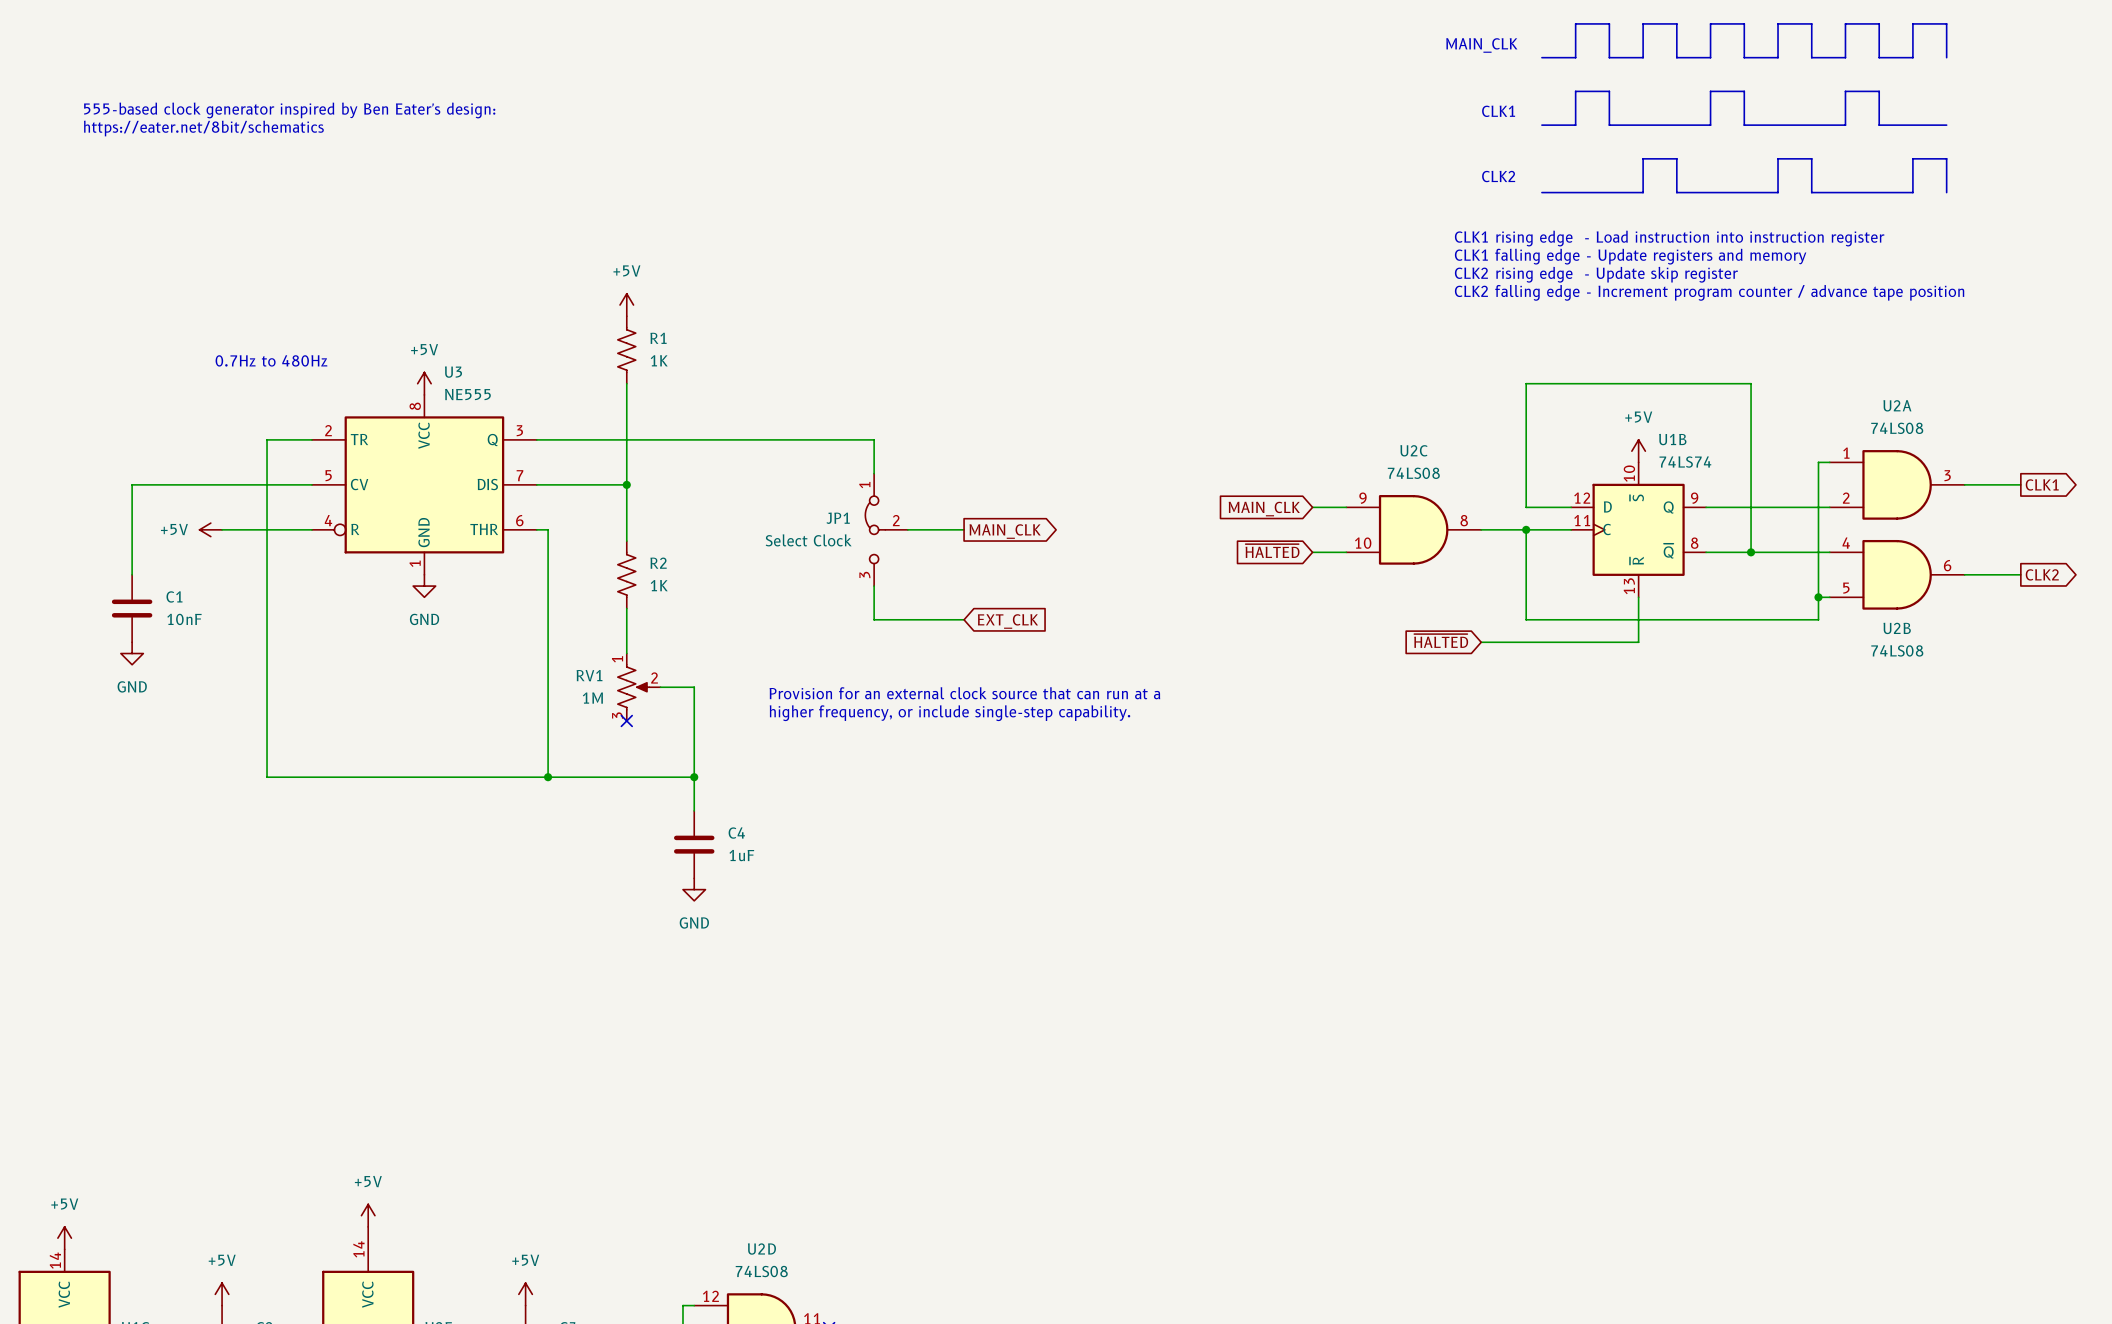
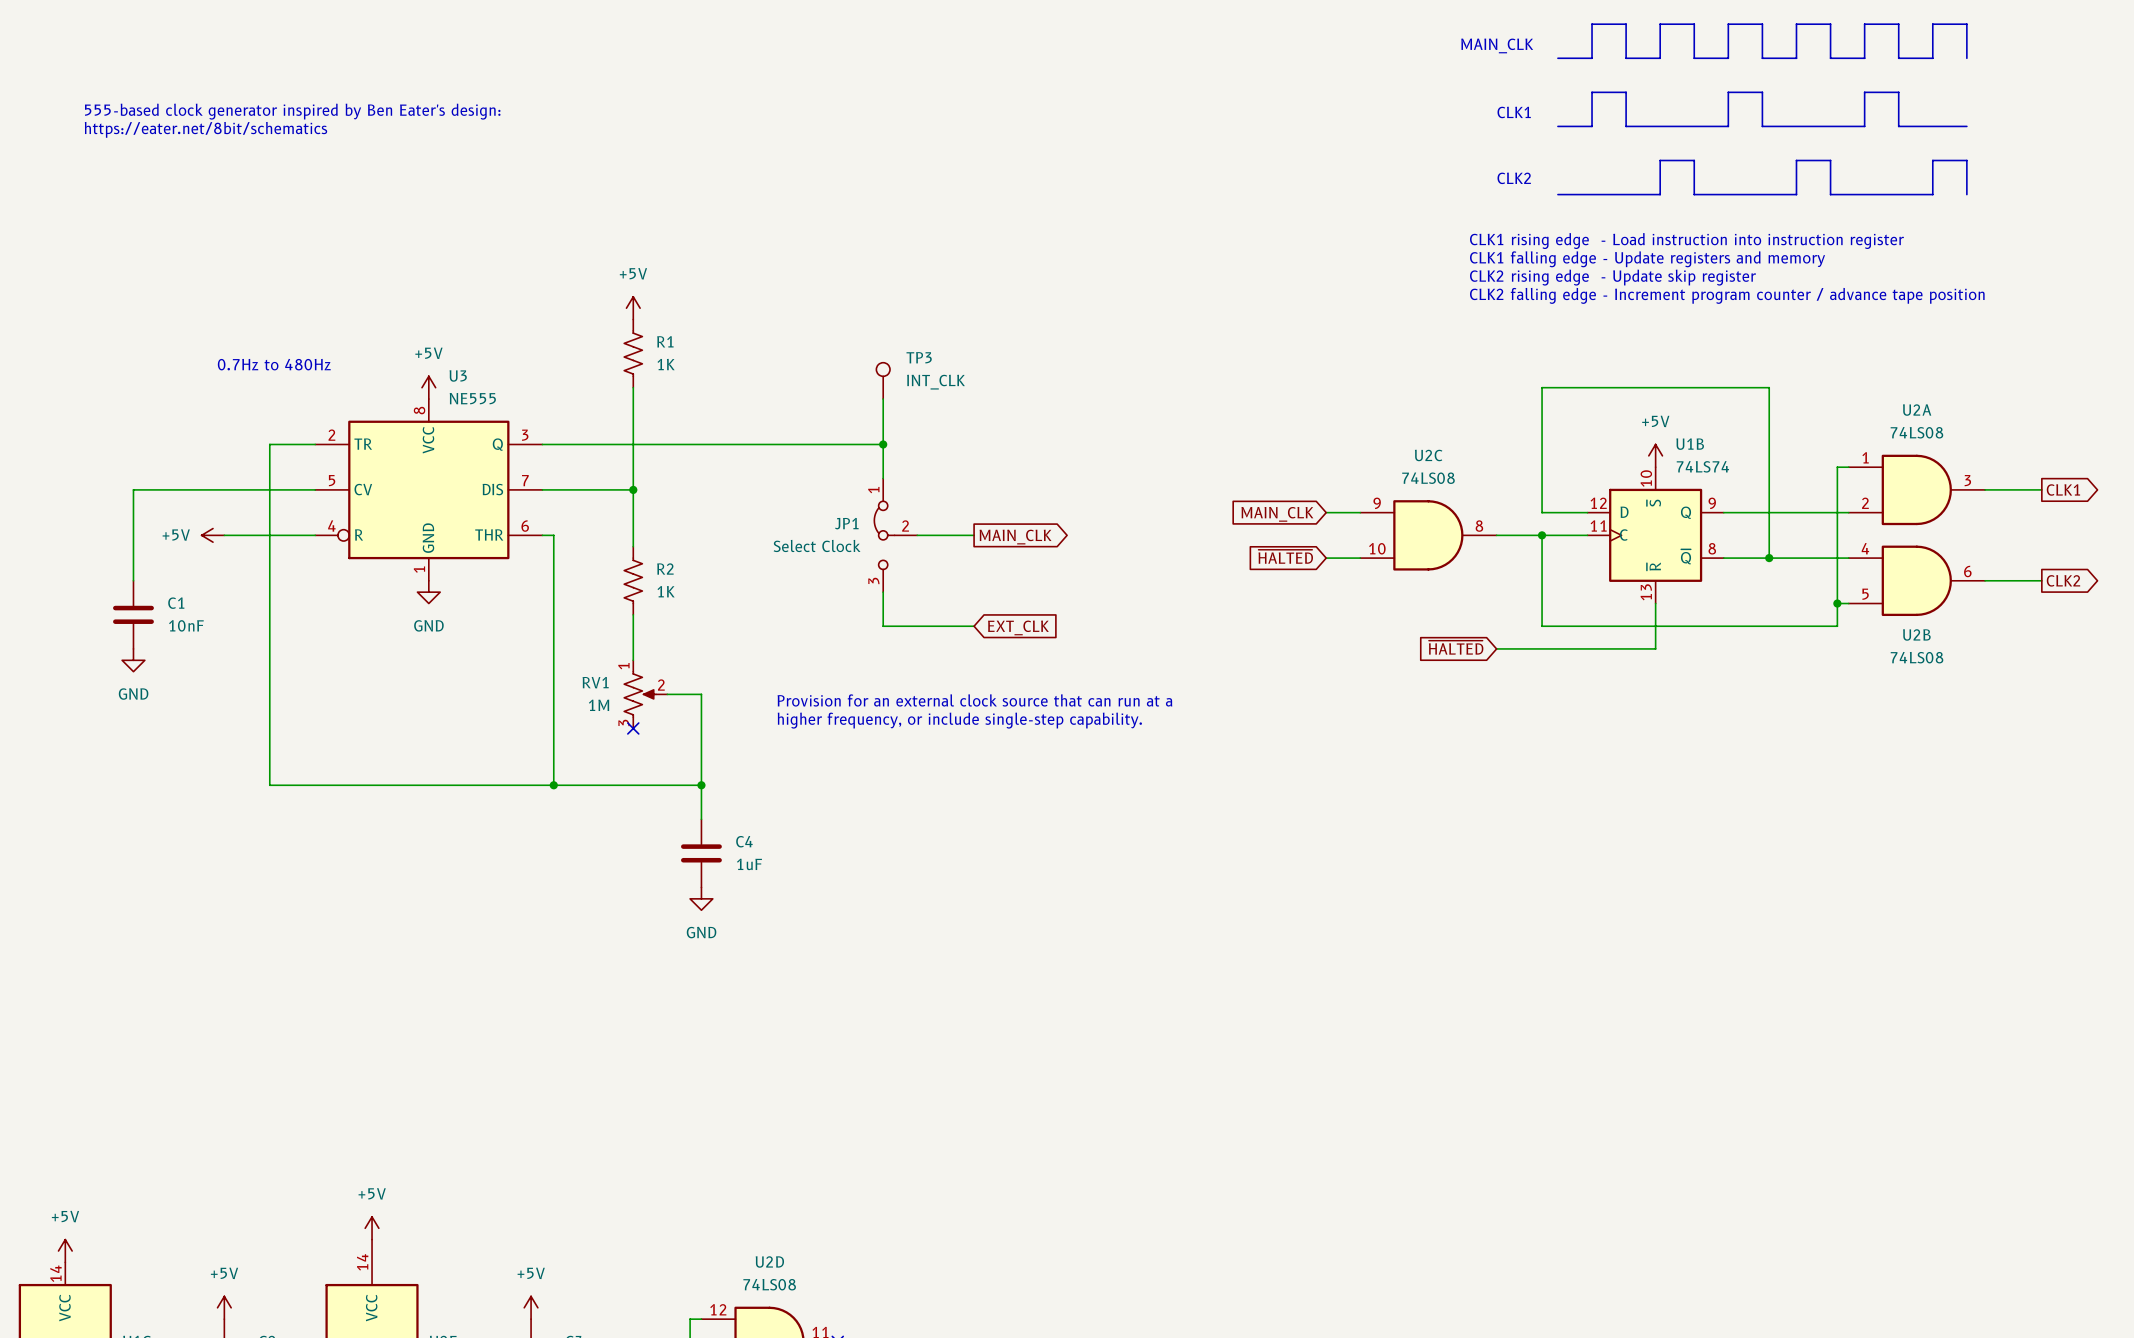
TP3: none -> INT_CLK (883, 380)
wire: none -> (883, 399) (883, 444)
junction: none -> (883, 444)

